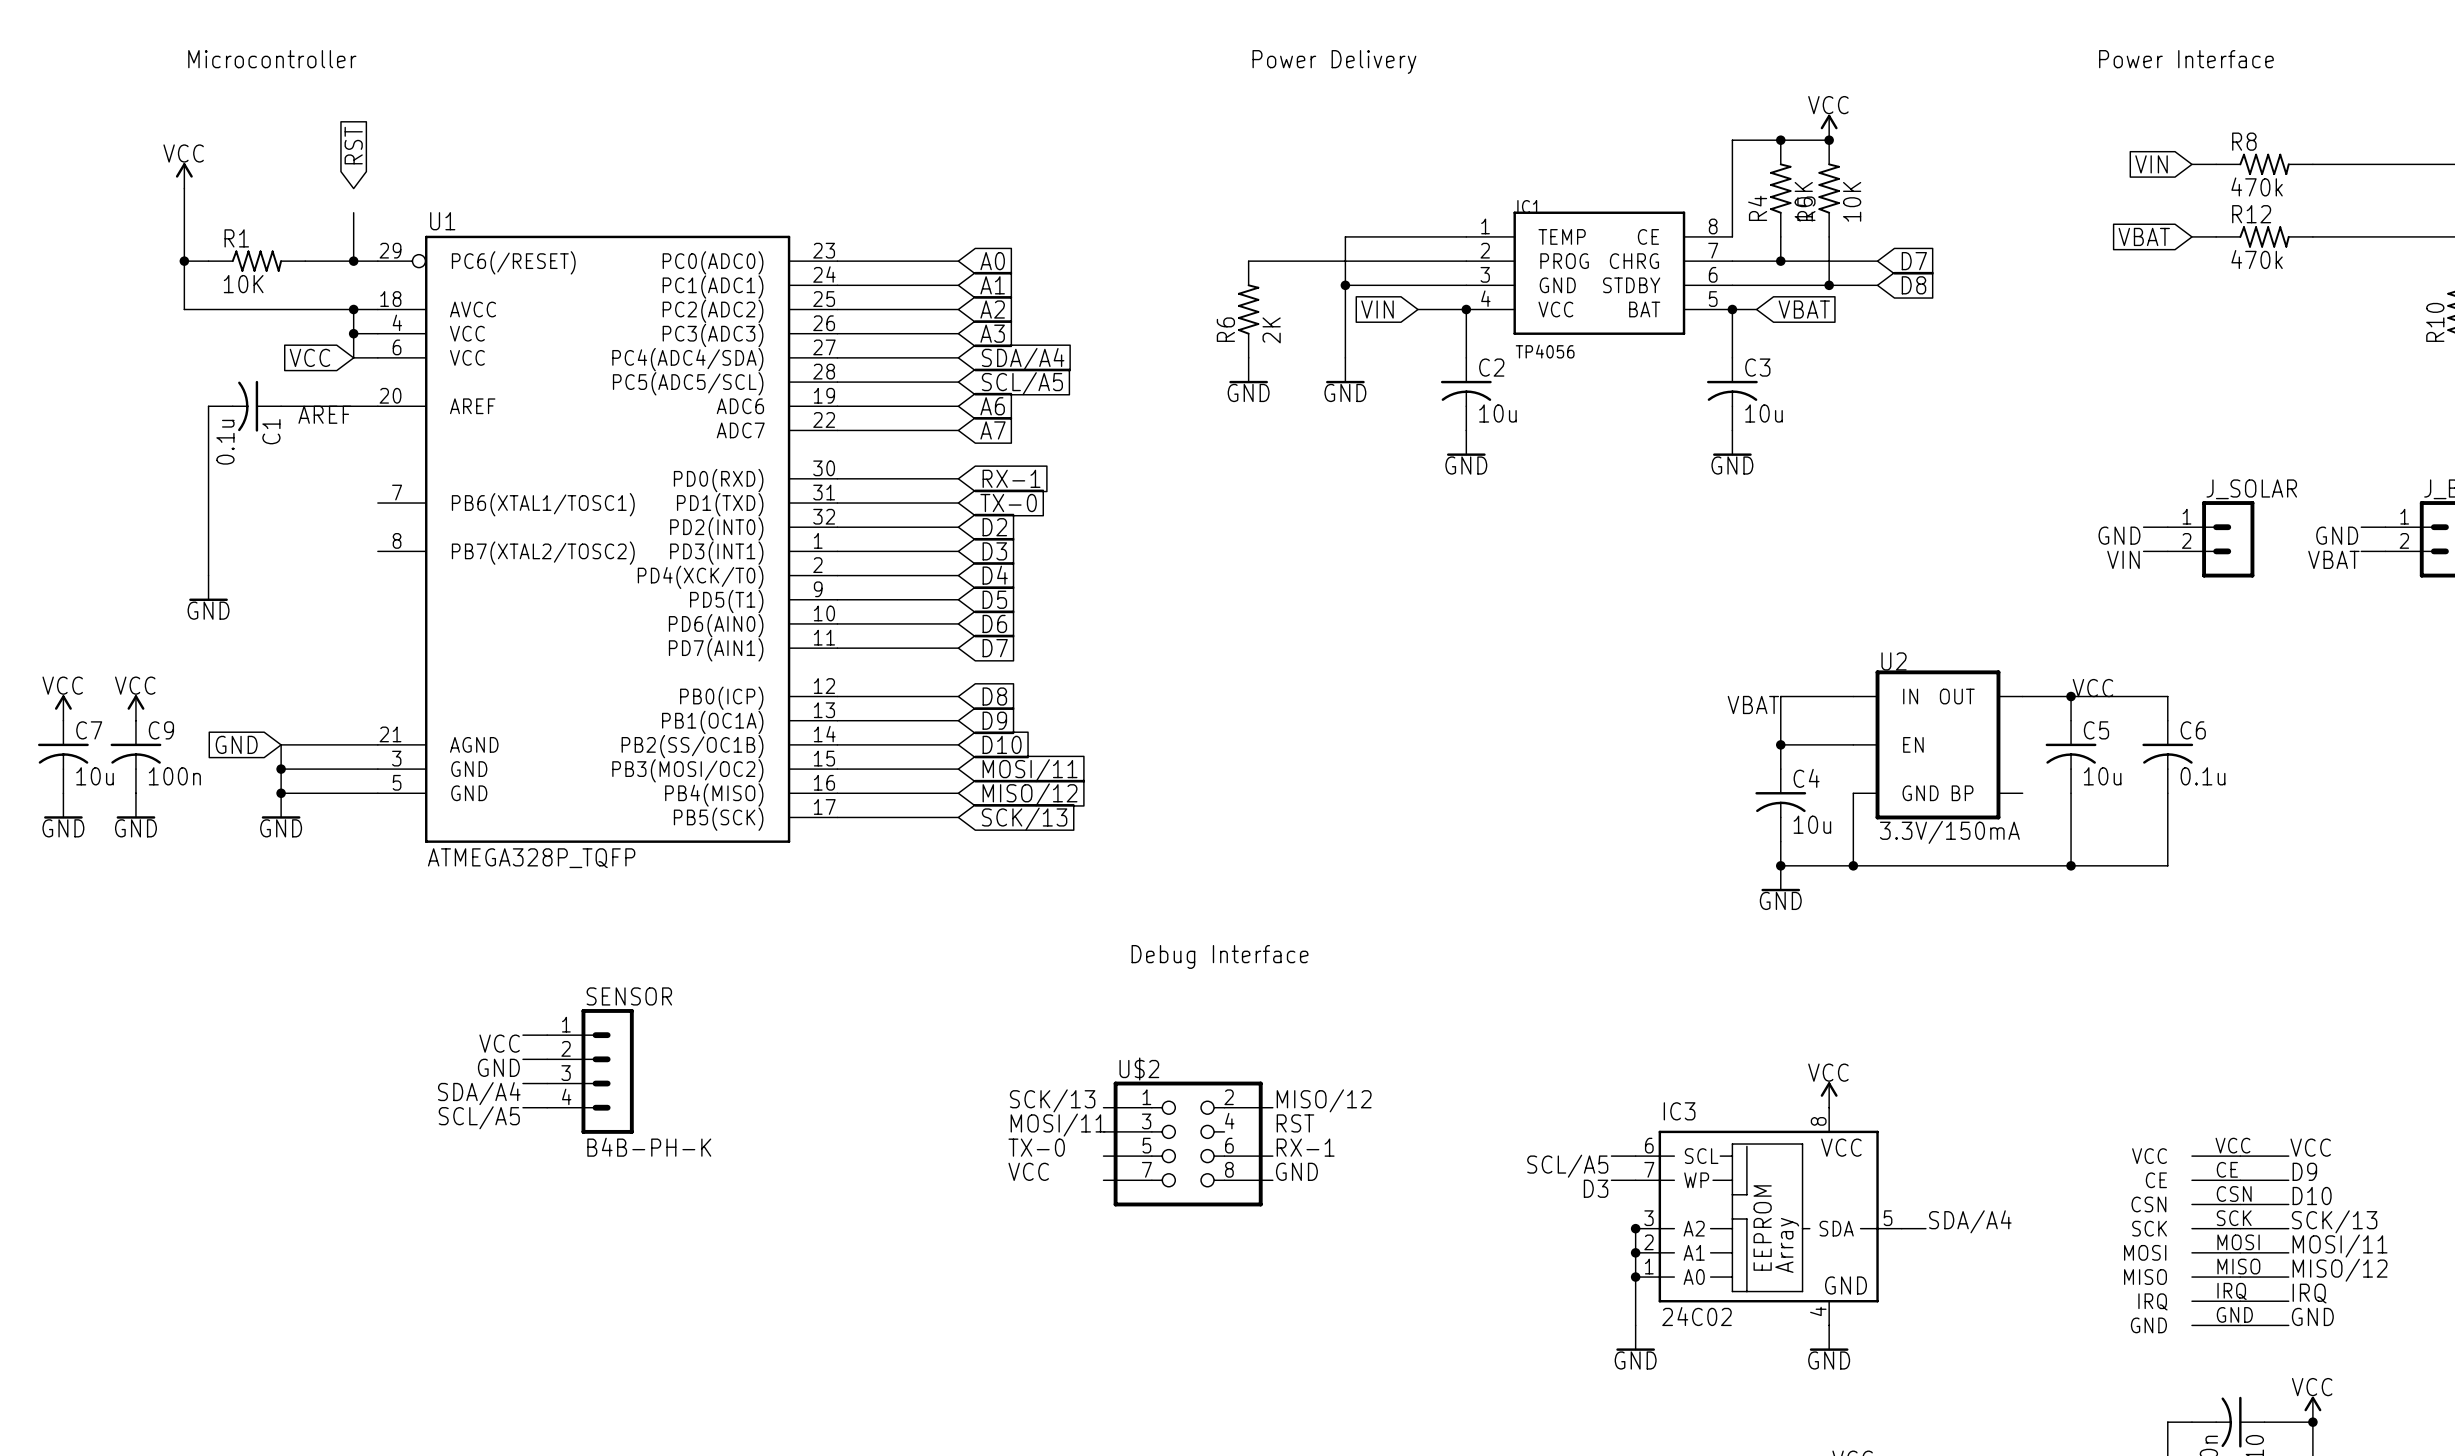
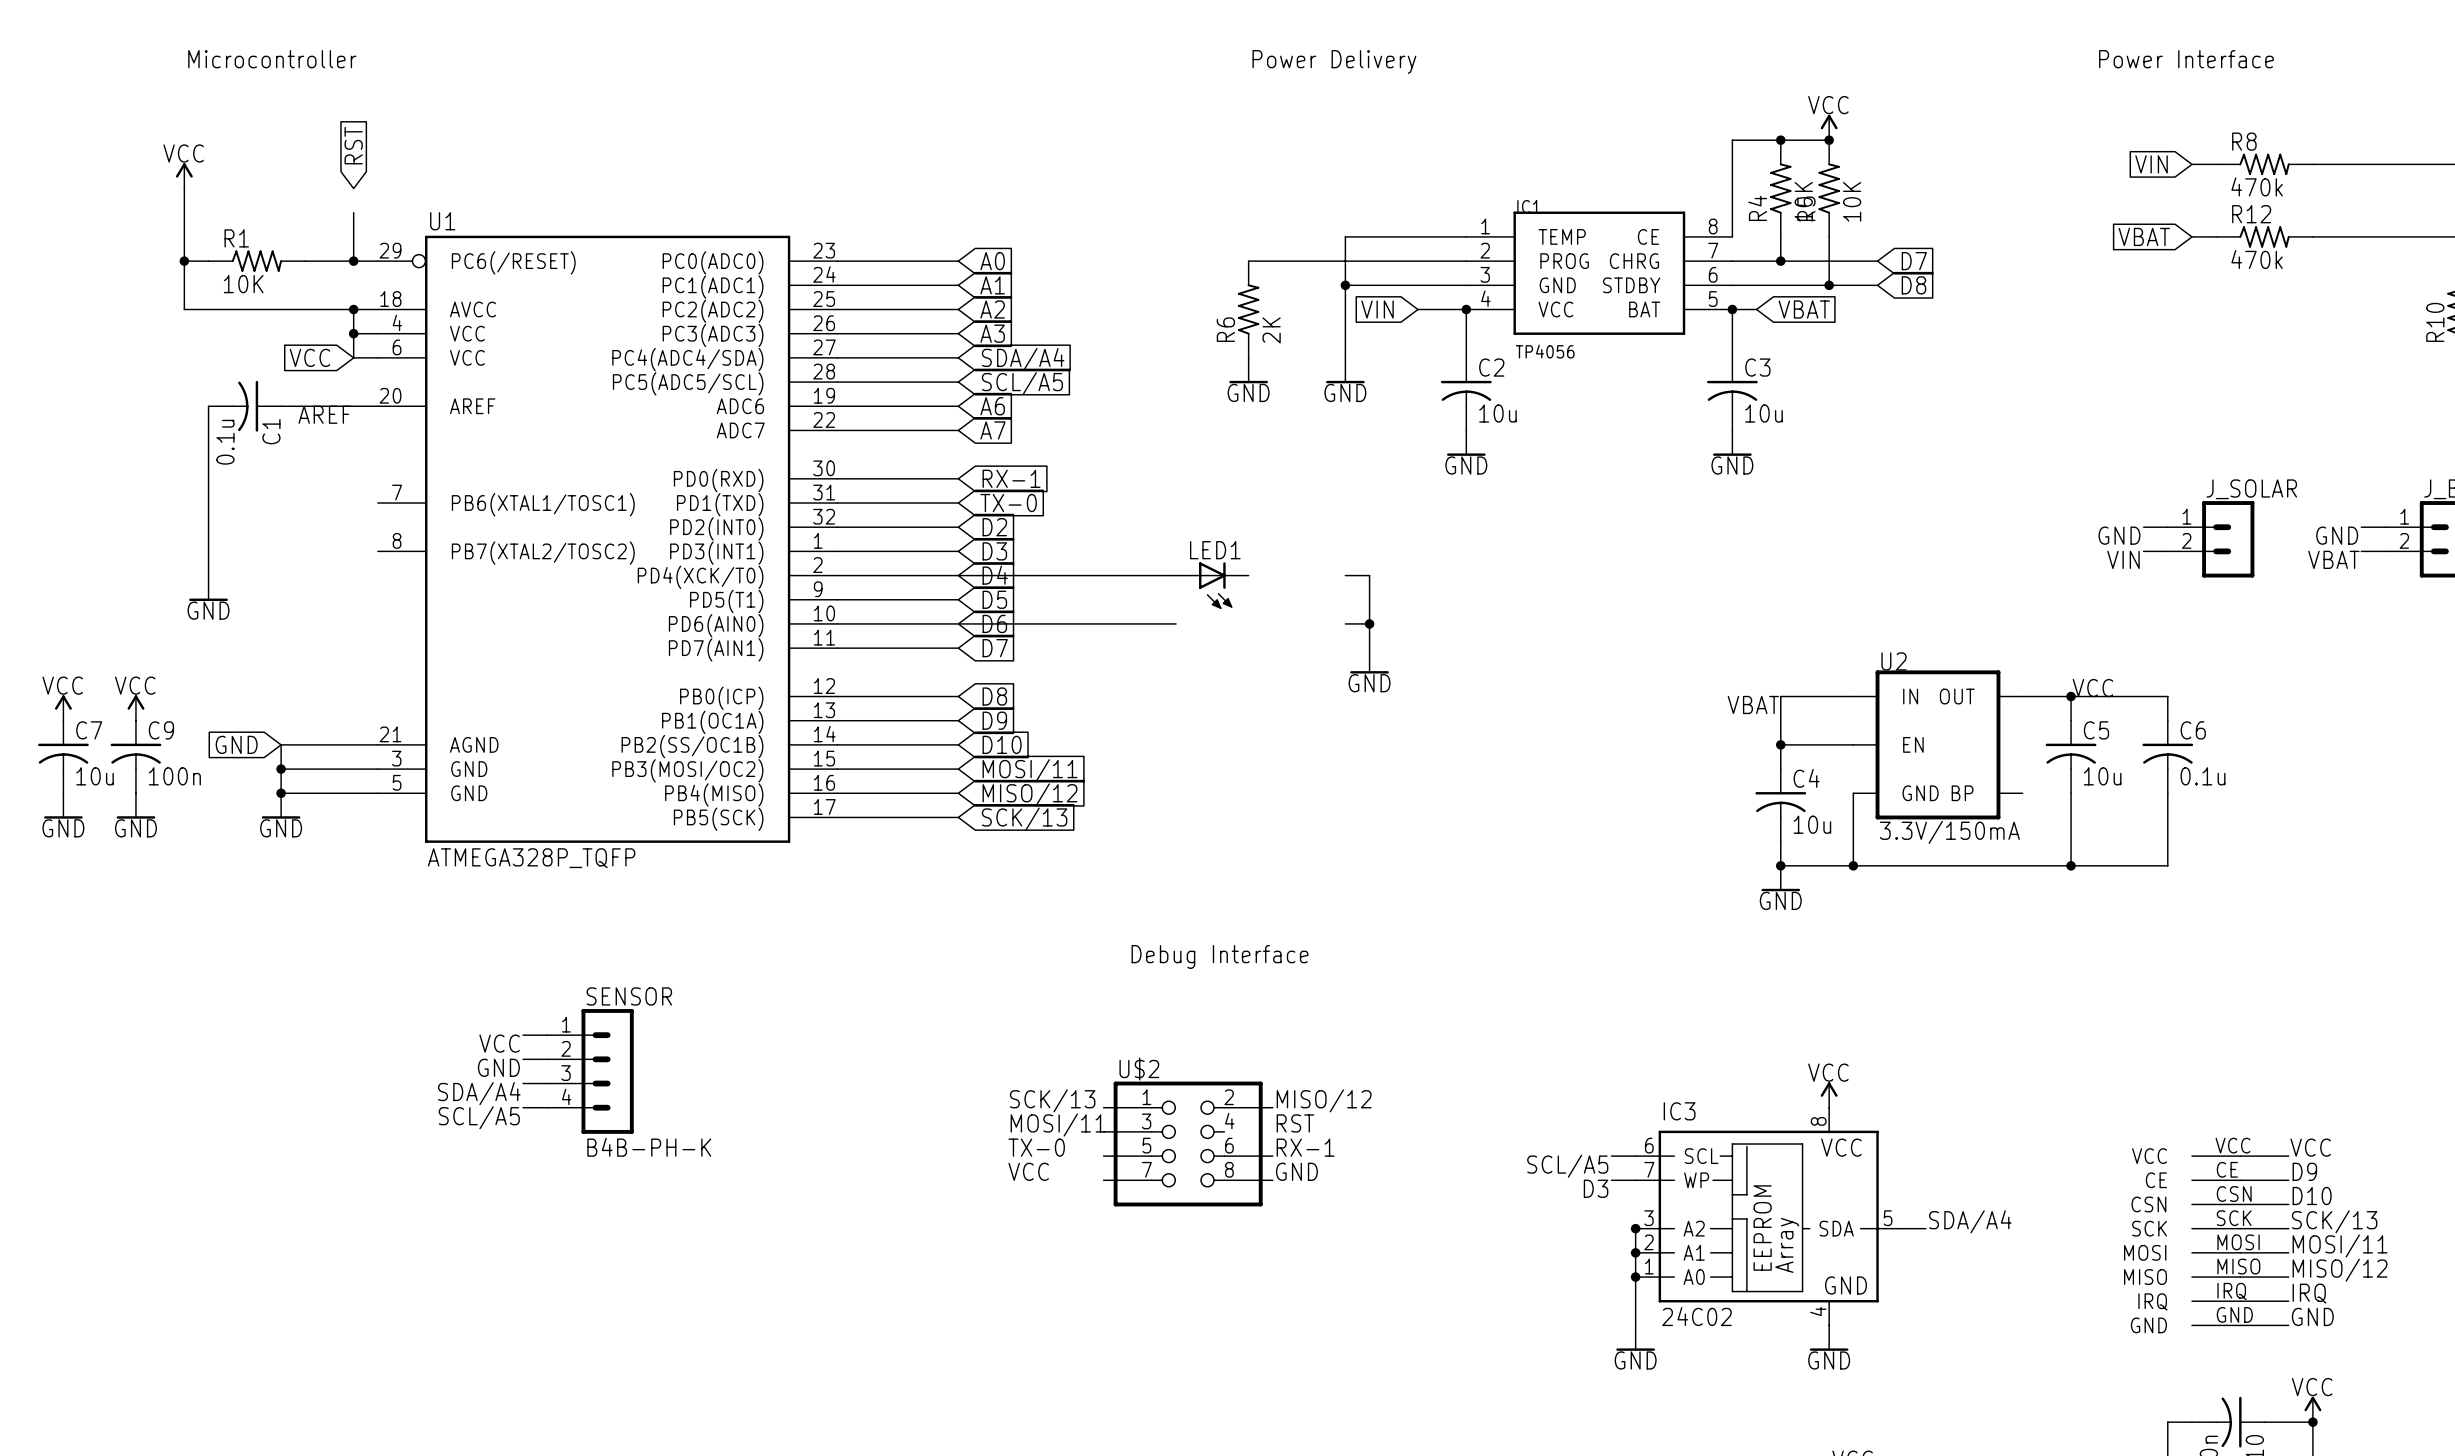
wire: none -> (958, 575) (1176, 575)
wire: none -> (1345, 575) (1369, 575) (1369, 648)
LED1: none -> (1212, 585)
wire: none -> (958, 623) (1176, 623)
wire: none -> (1345, 623) (1369, 623)
junction: none -> (1369, 623)
power symbol: none -> GND (1369, 660)

